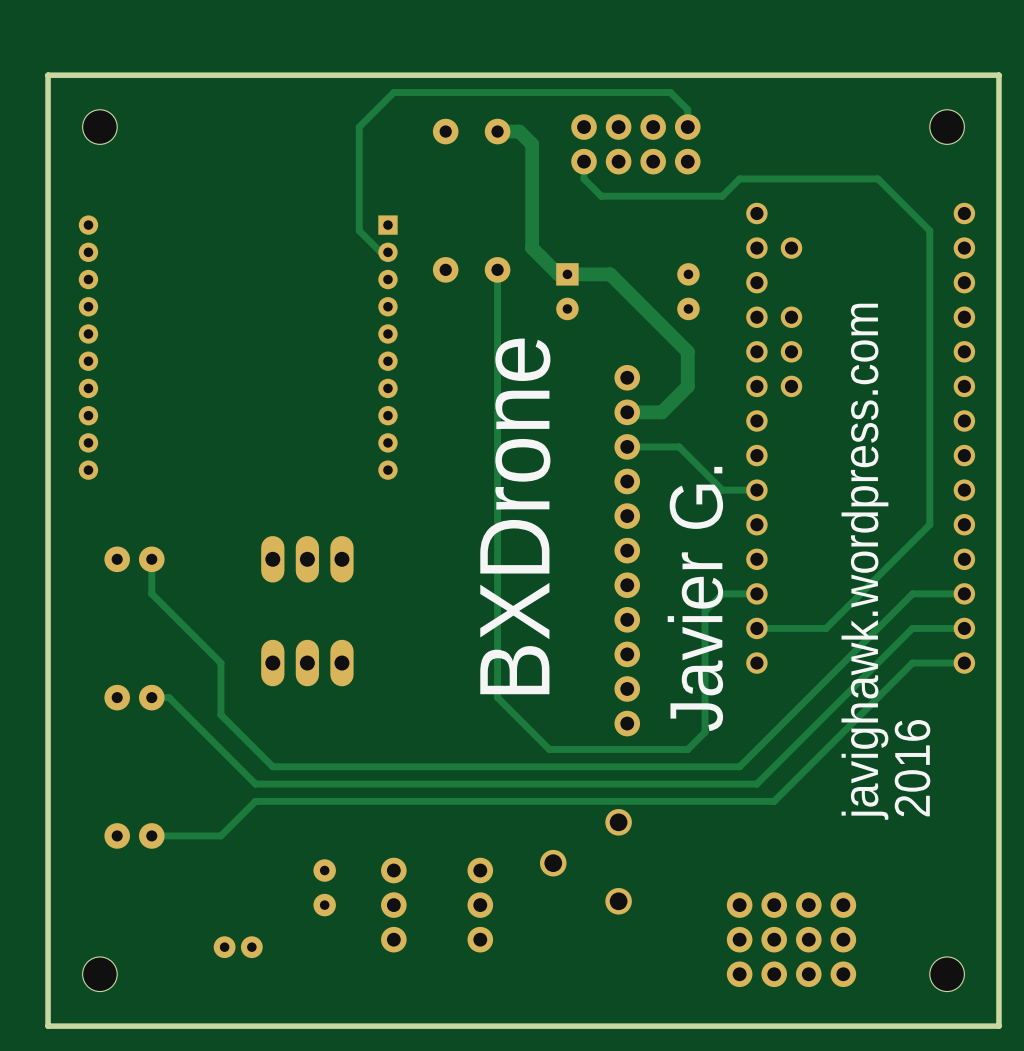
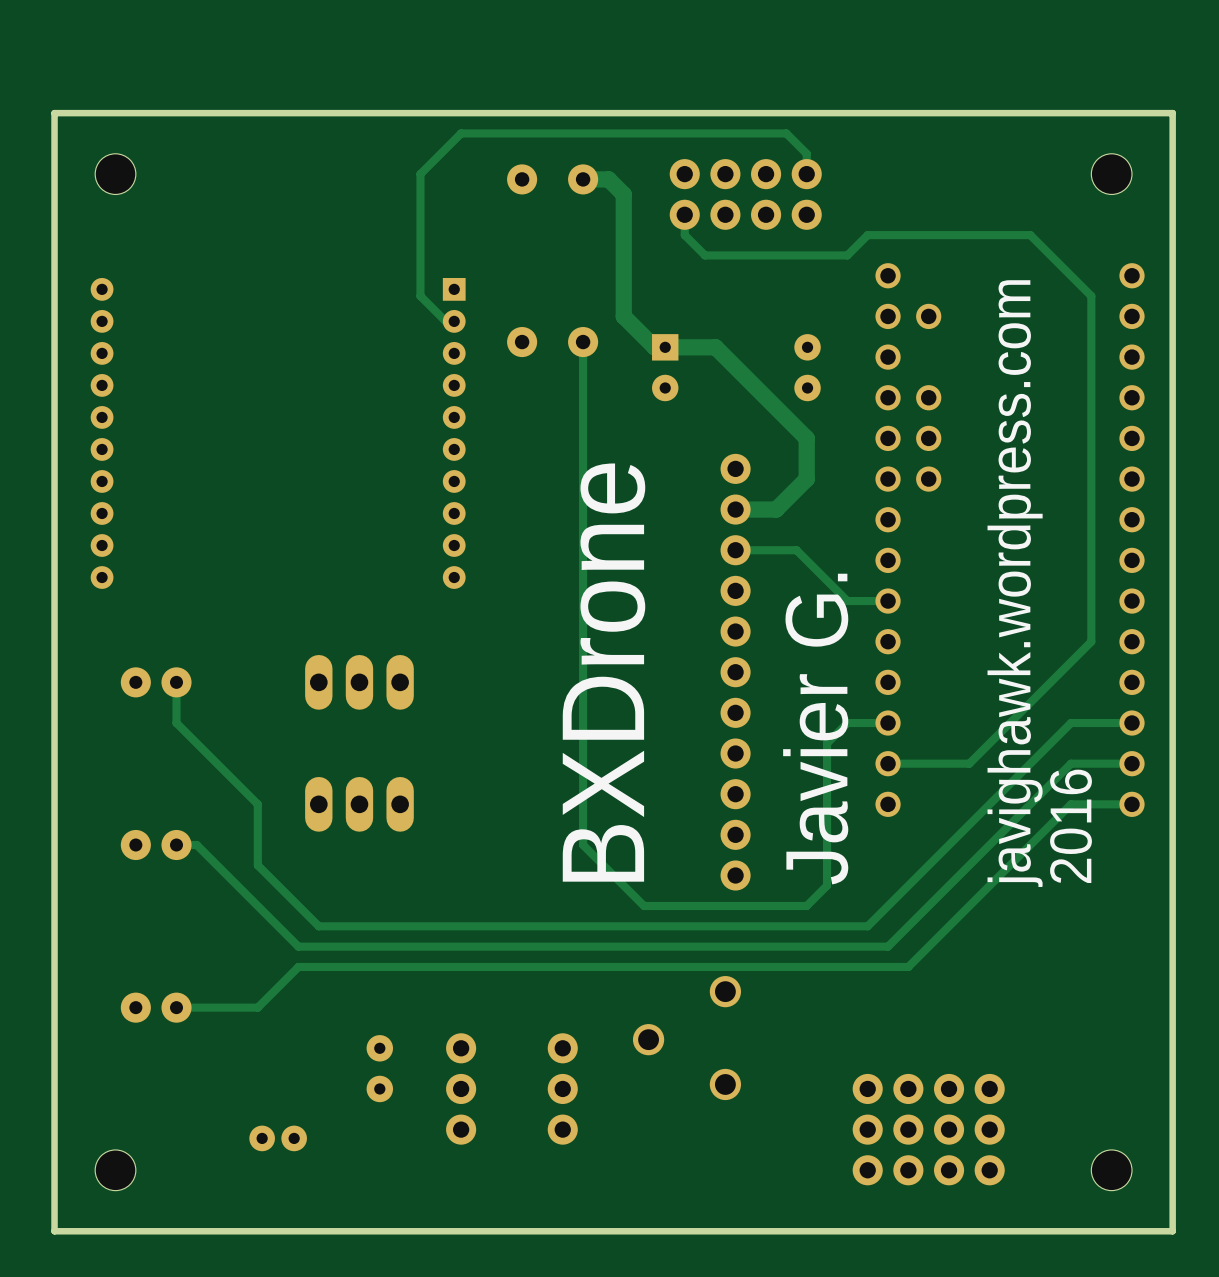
text position: BXDrone (515, 516) -> BXDrone (604, 672)
text position: javighawk.wordpress.com (864, 561) -> javighawk.wordpress.com (1015, 583)
text position: 2016 (912, 768) -> 2016 (1071, 826)

